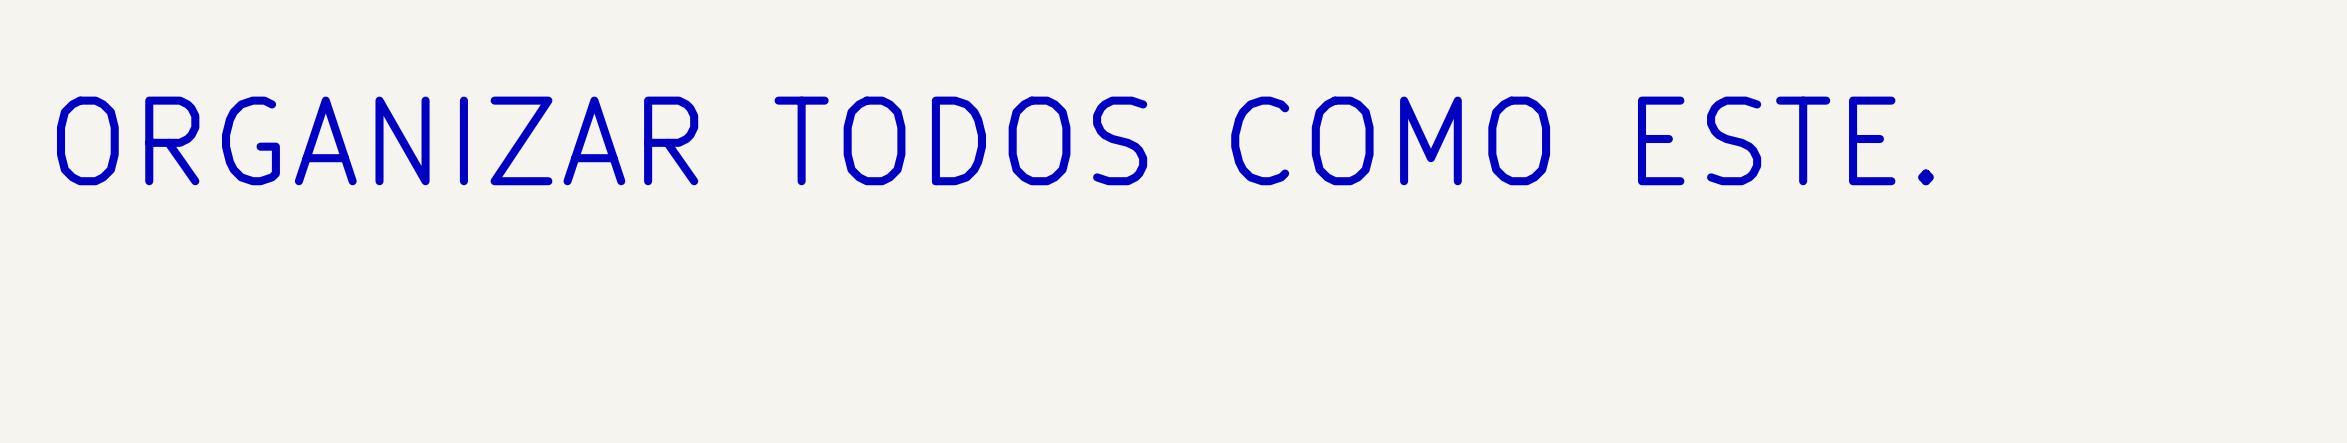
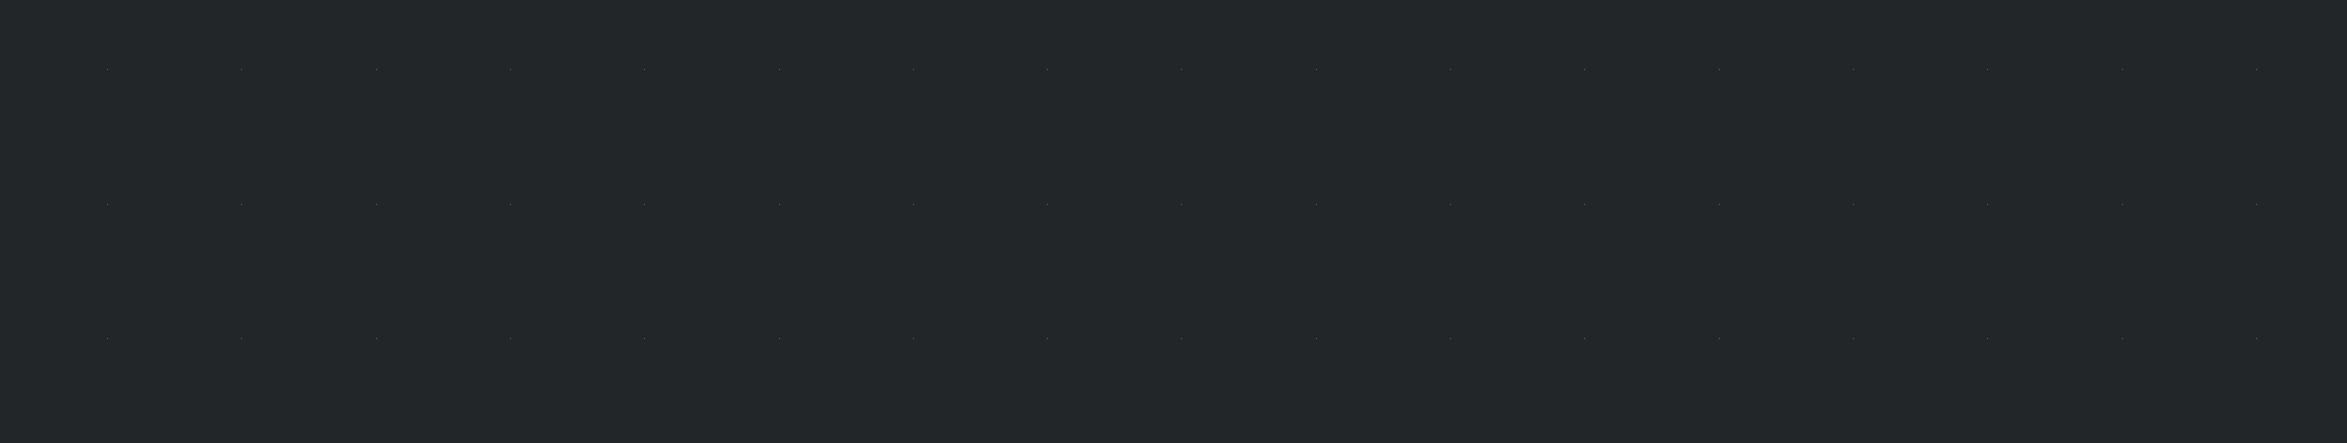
text: ORGANIZAR TODOS COMO ESTE. (995, 140) -> none

